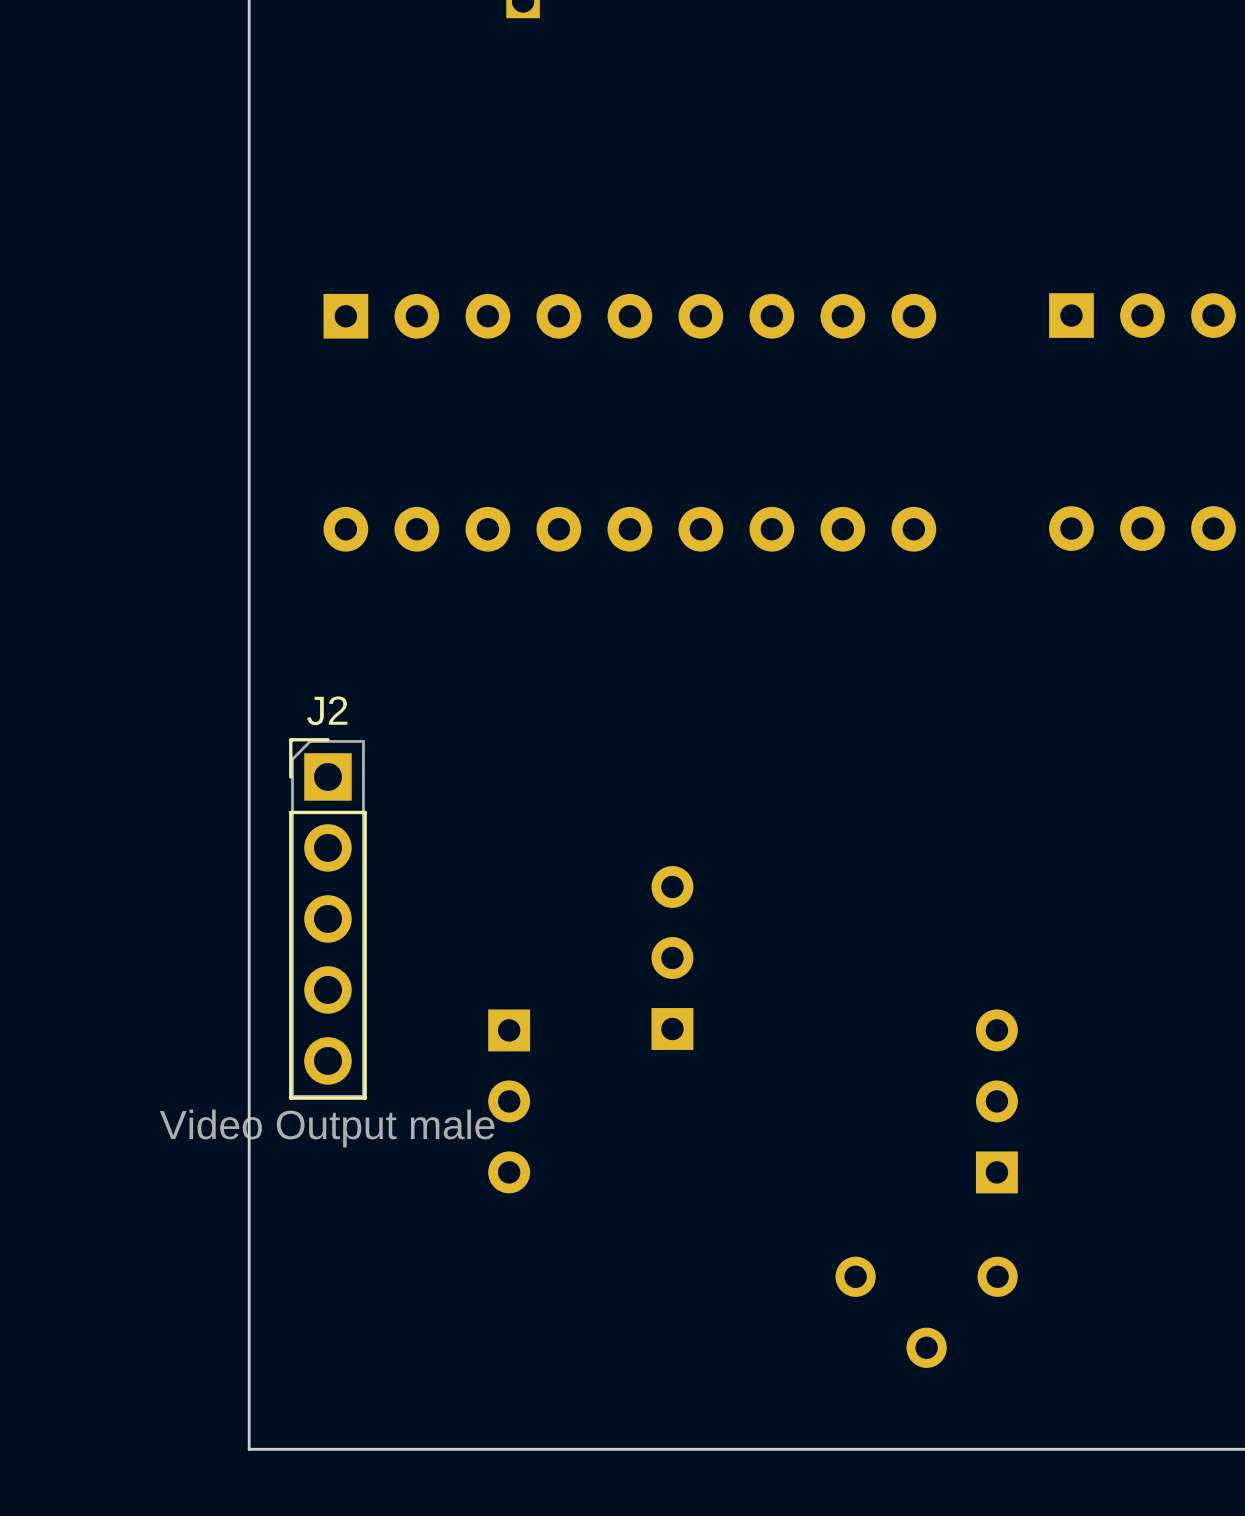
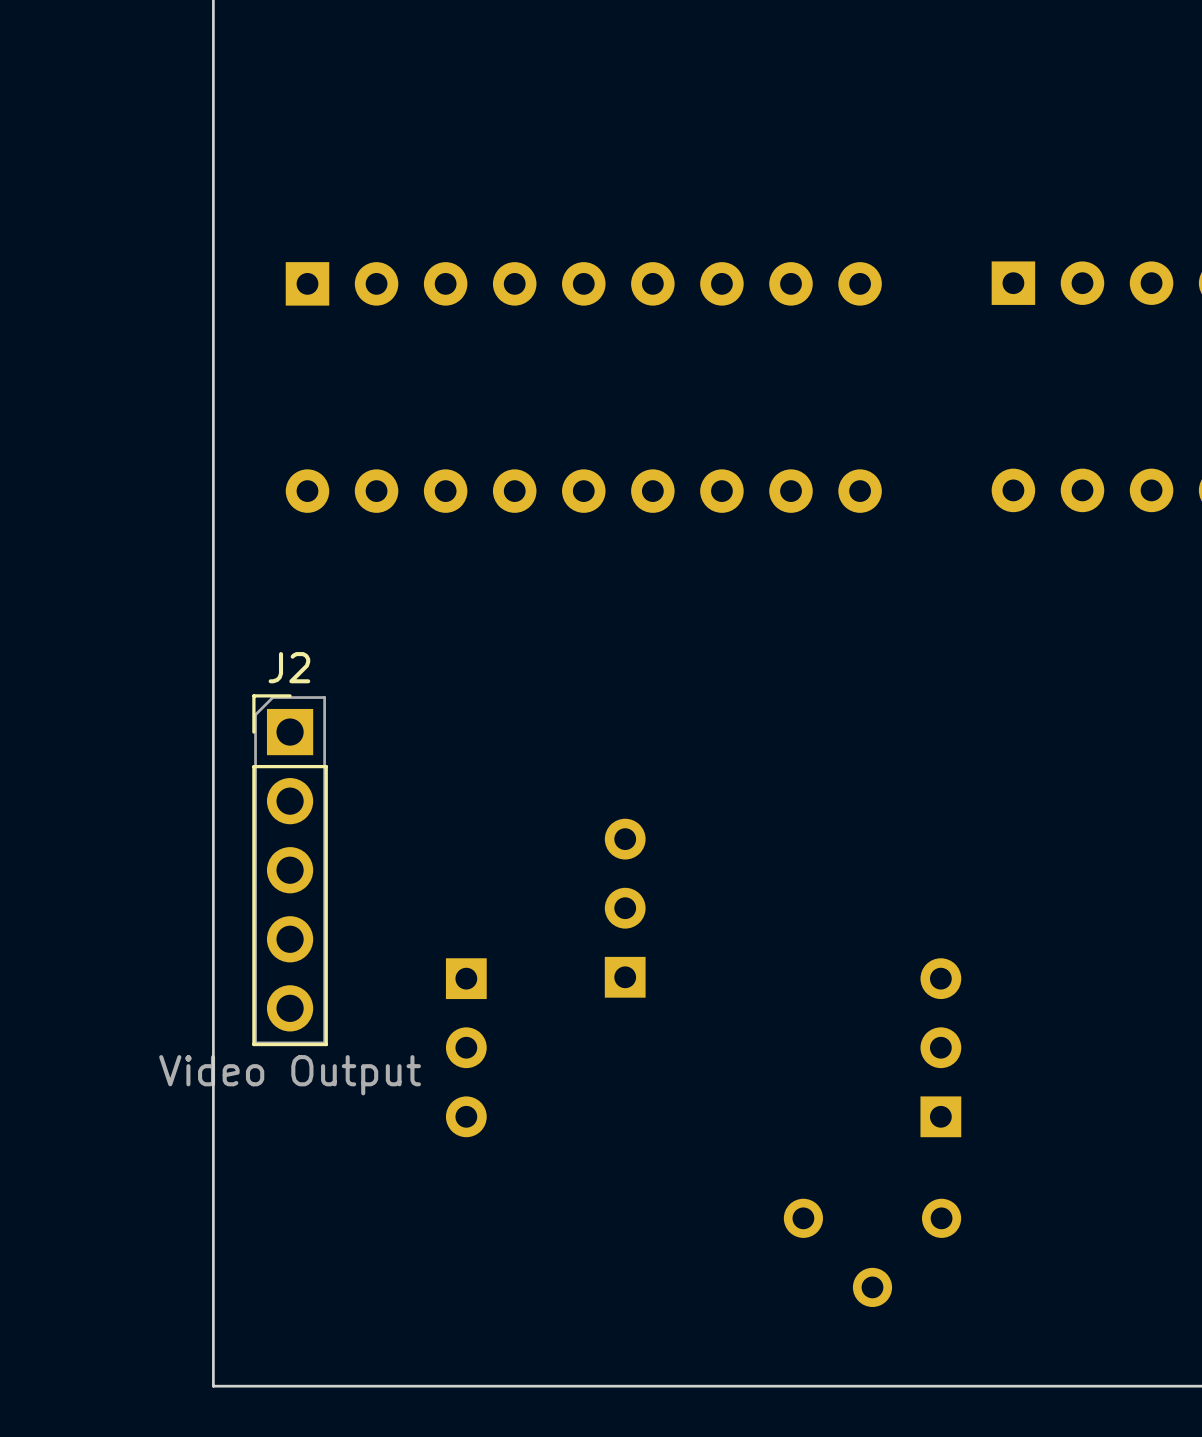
J2 value: Video Output male (327, 1128) -> Video Output (290, 1075)

